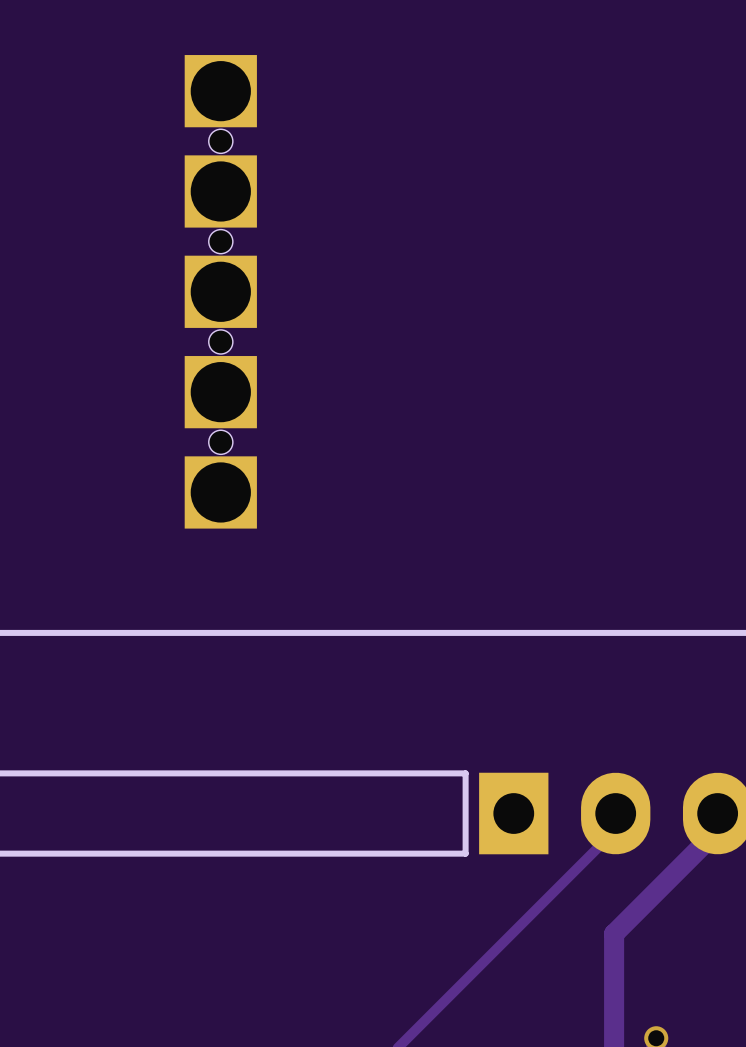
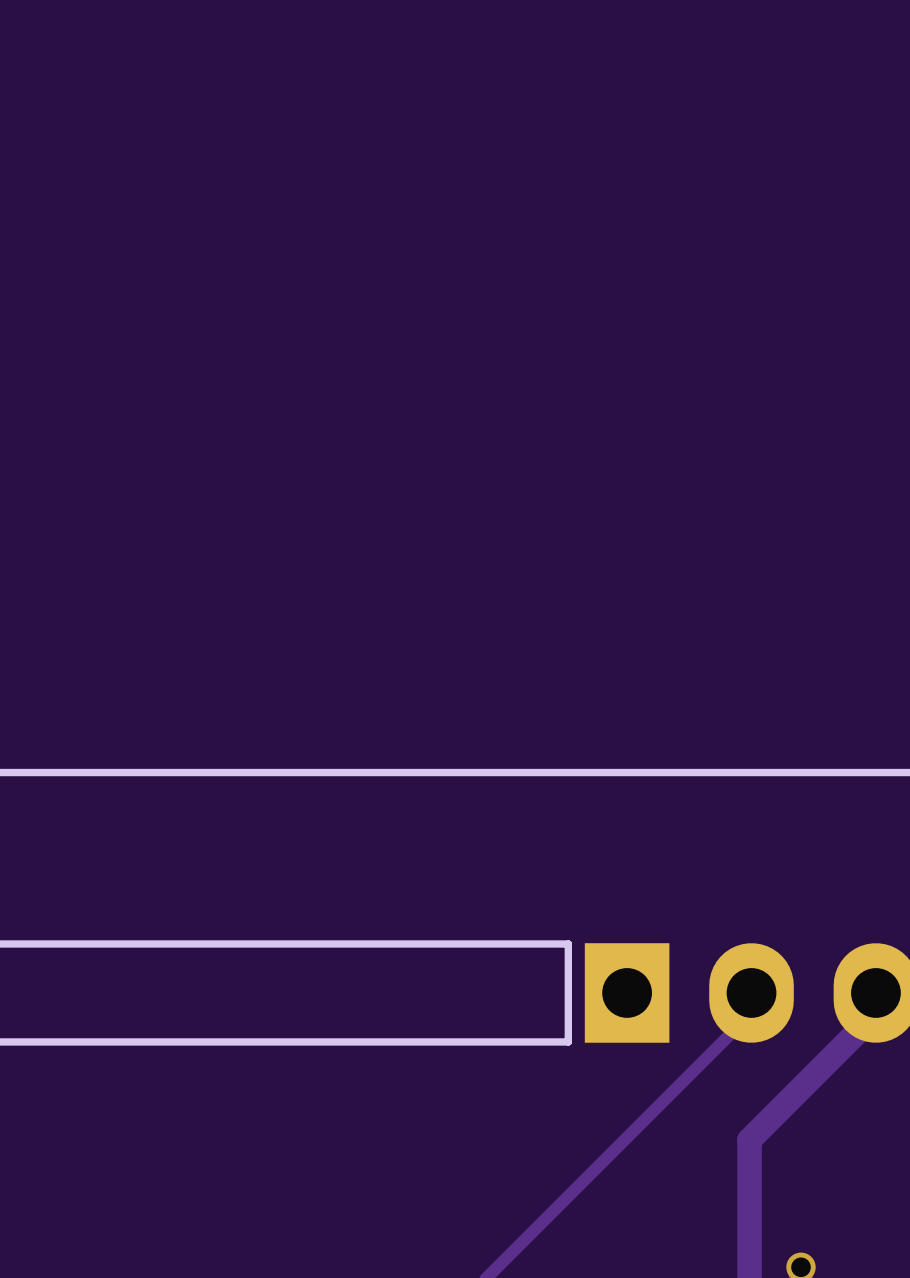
part: (220, 291) -> none

